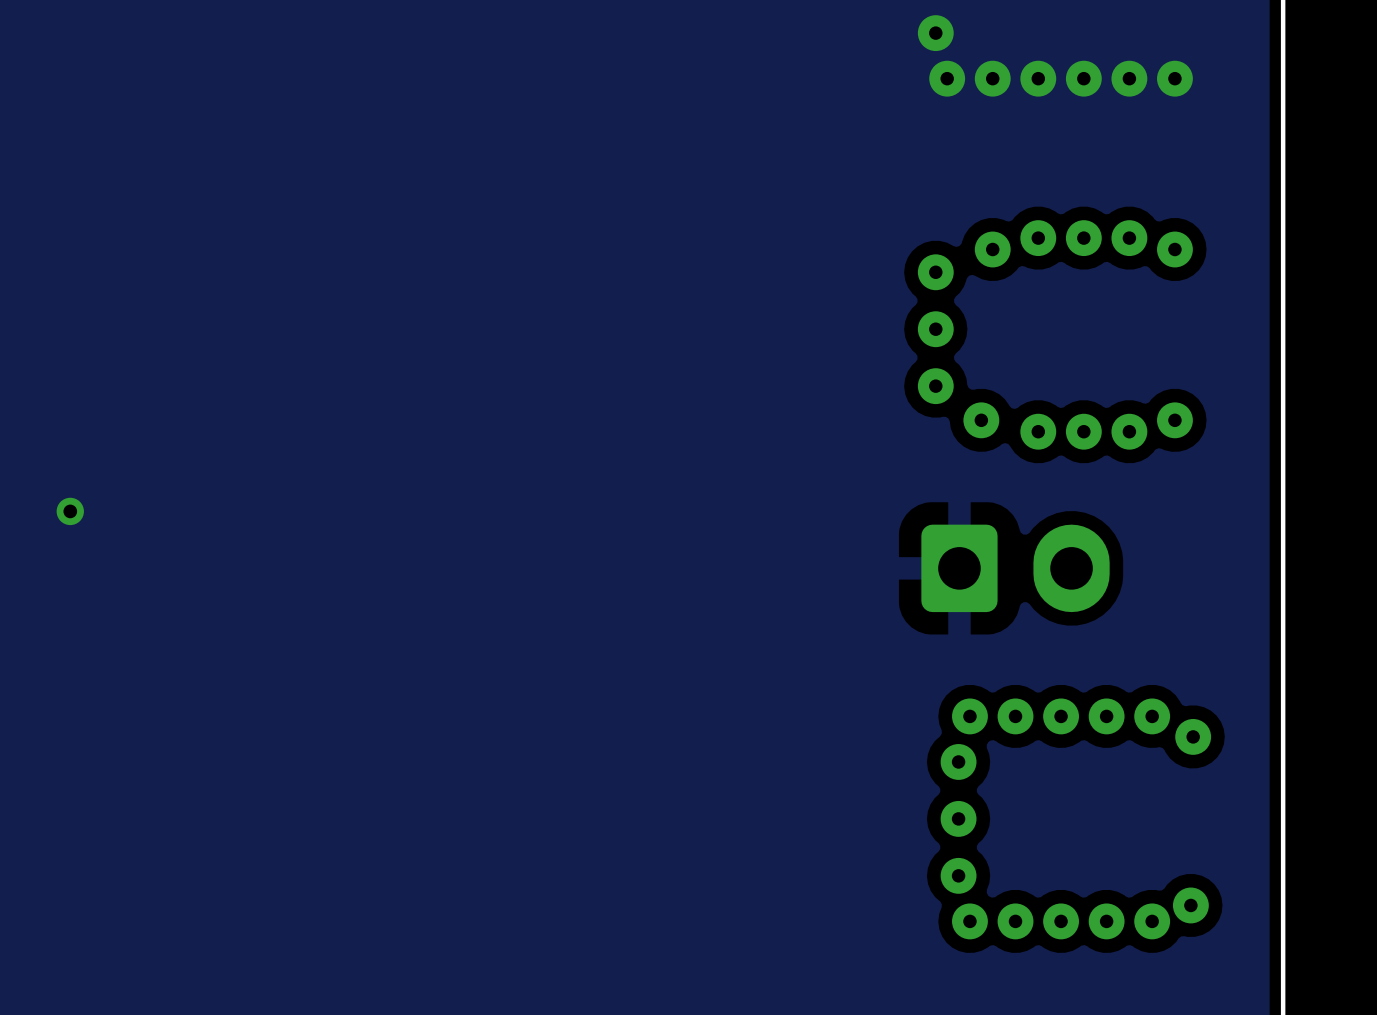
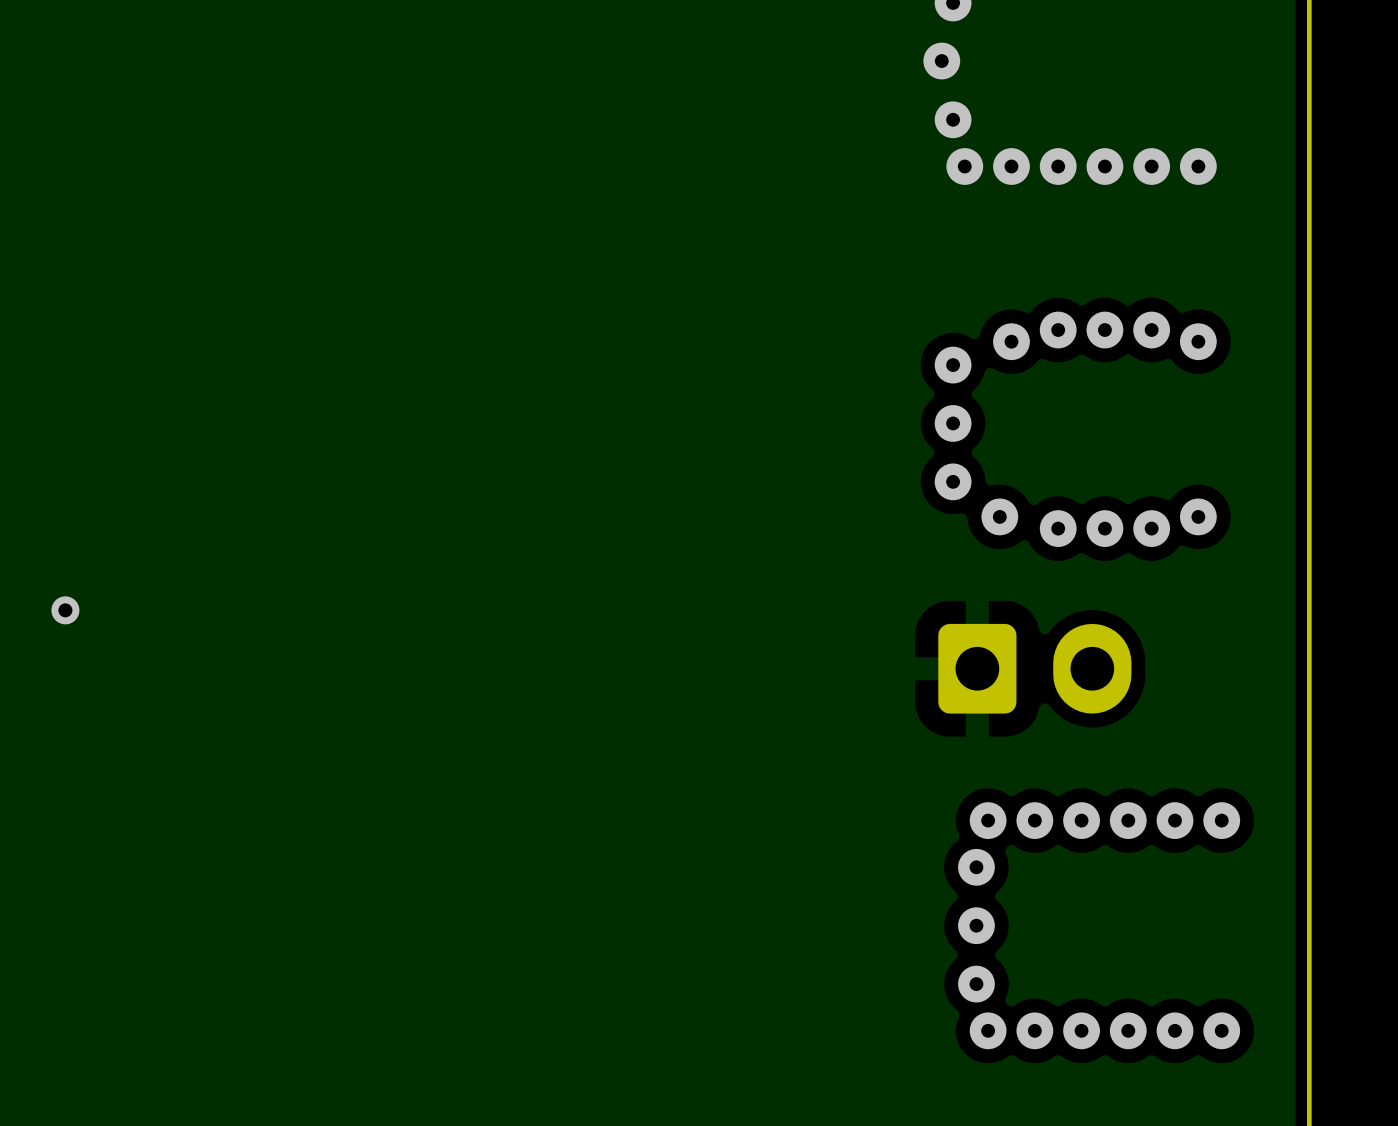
via position: (1193, 736) -> (1221, 820)
via position: (1190, 905) -> (1221, 1030)

